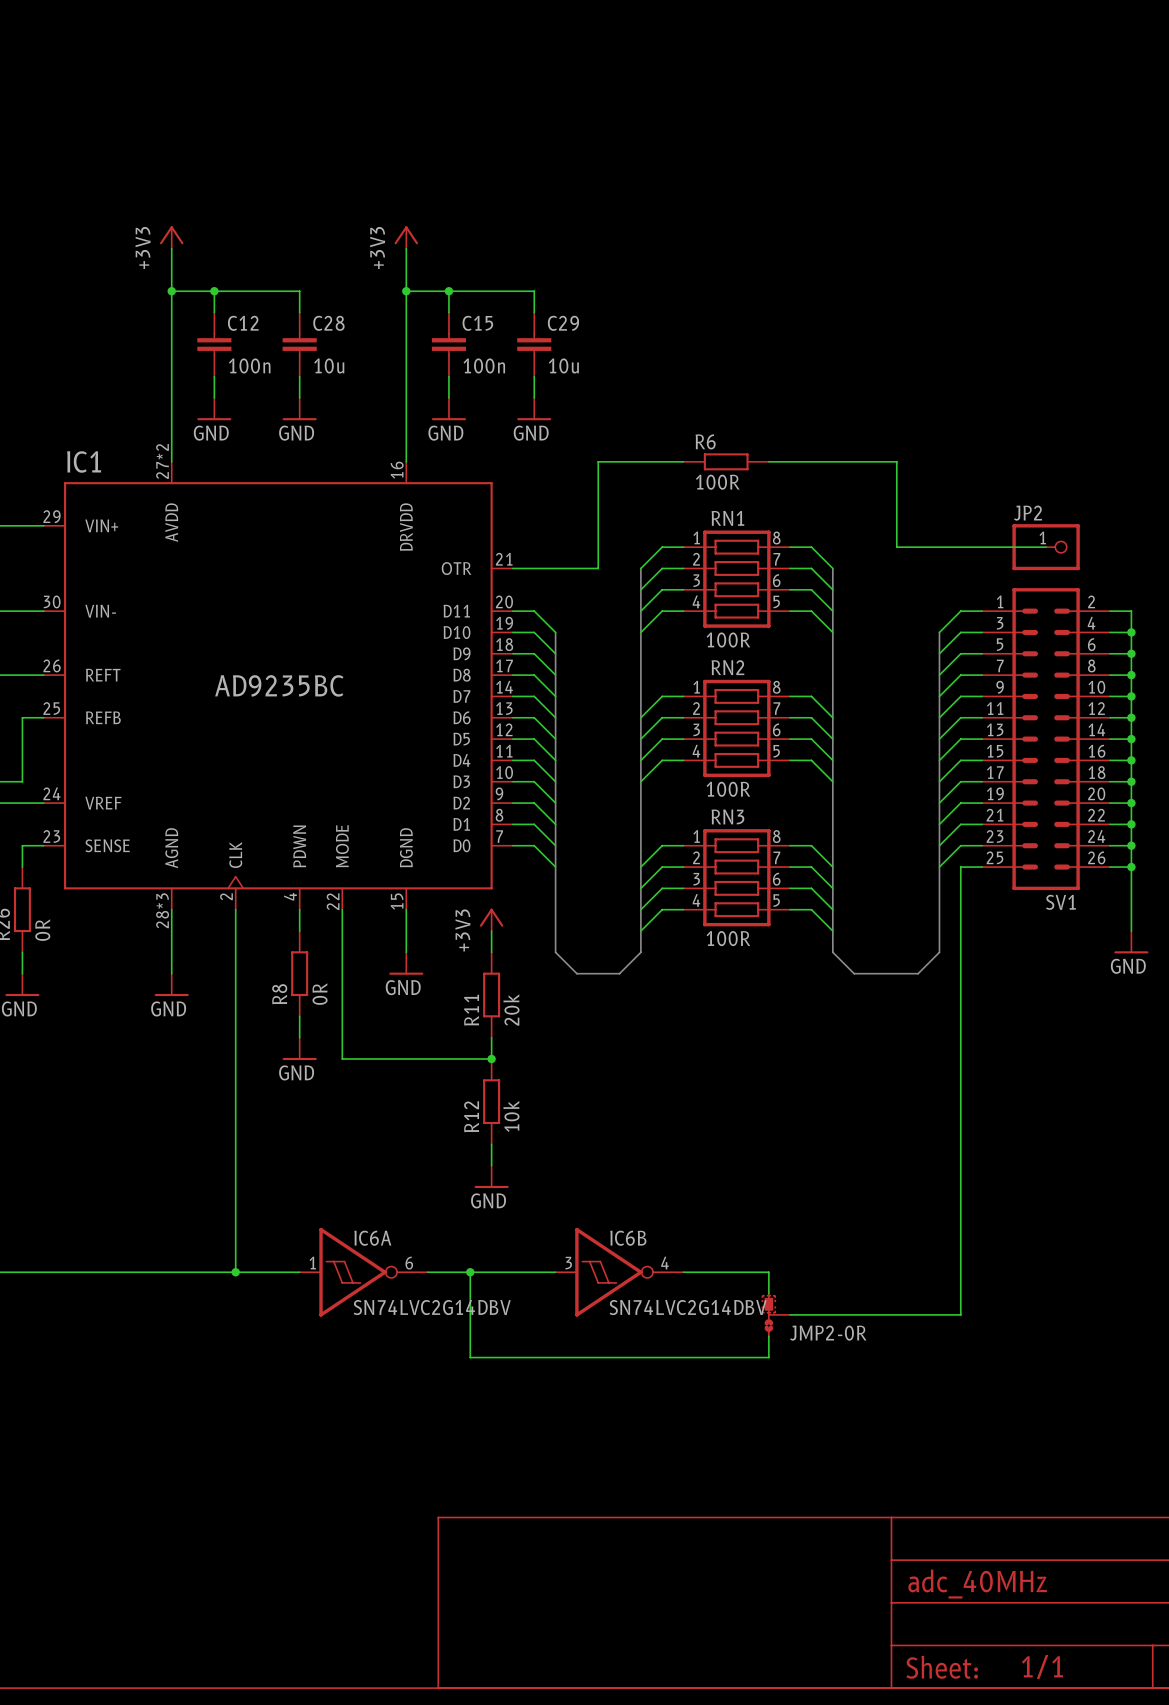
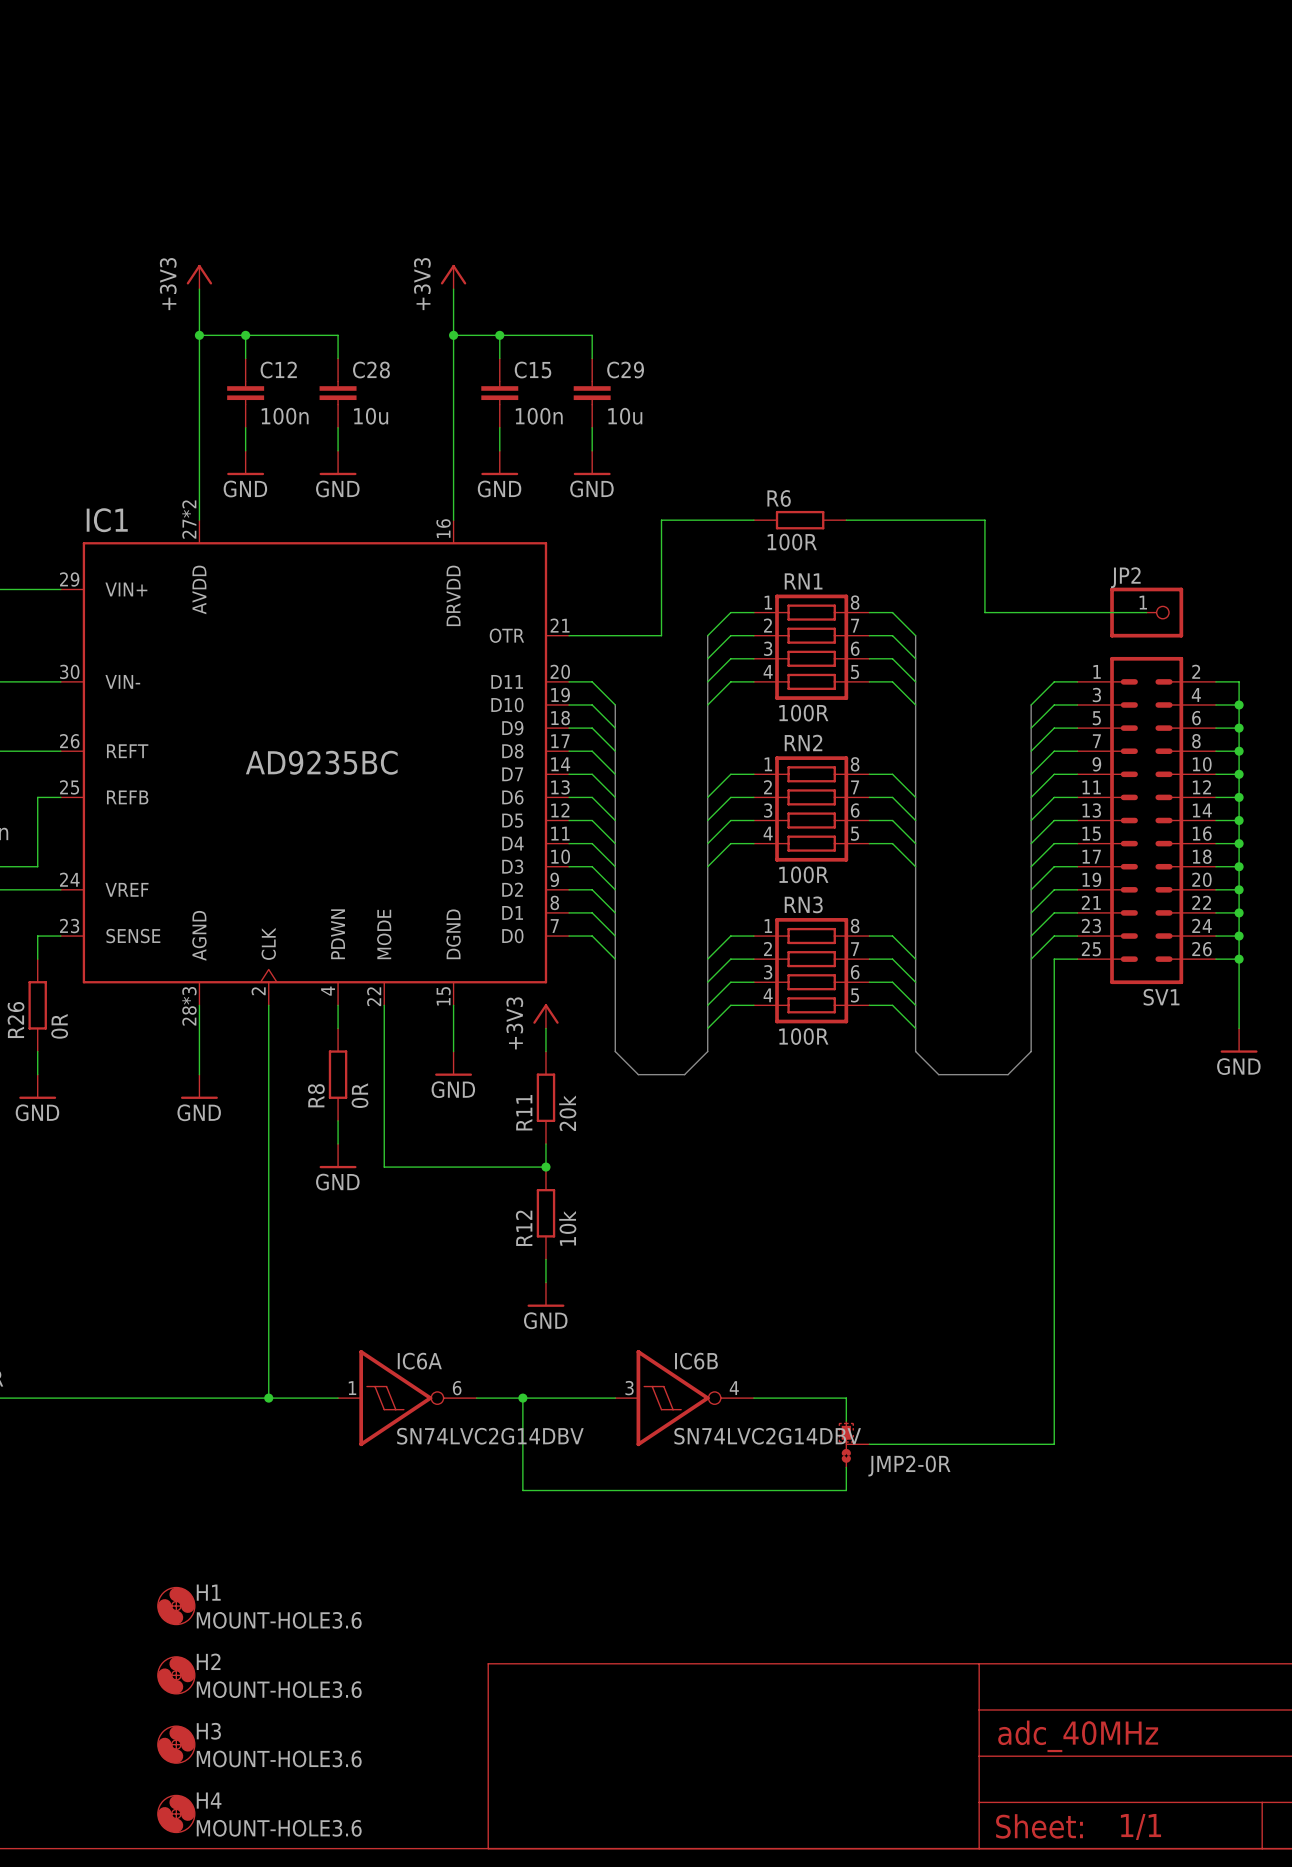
H1: none -> MOUNT-HOLE3.6 (176, 1606)
H2: none -> MOUNT-HOLE3.6 (176, 1675)
H3: none -> MOUNT-HOLE3.6 (176, 1744)
H4: none -> MOUNT-HOLE3.6 (176, 1813)

